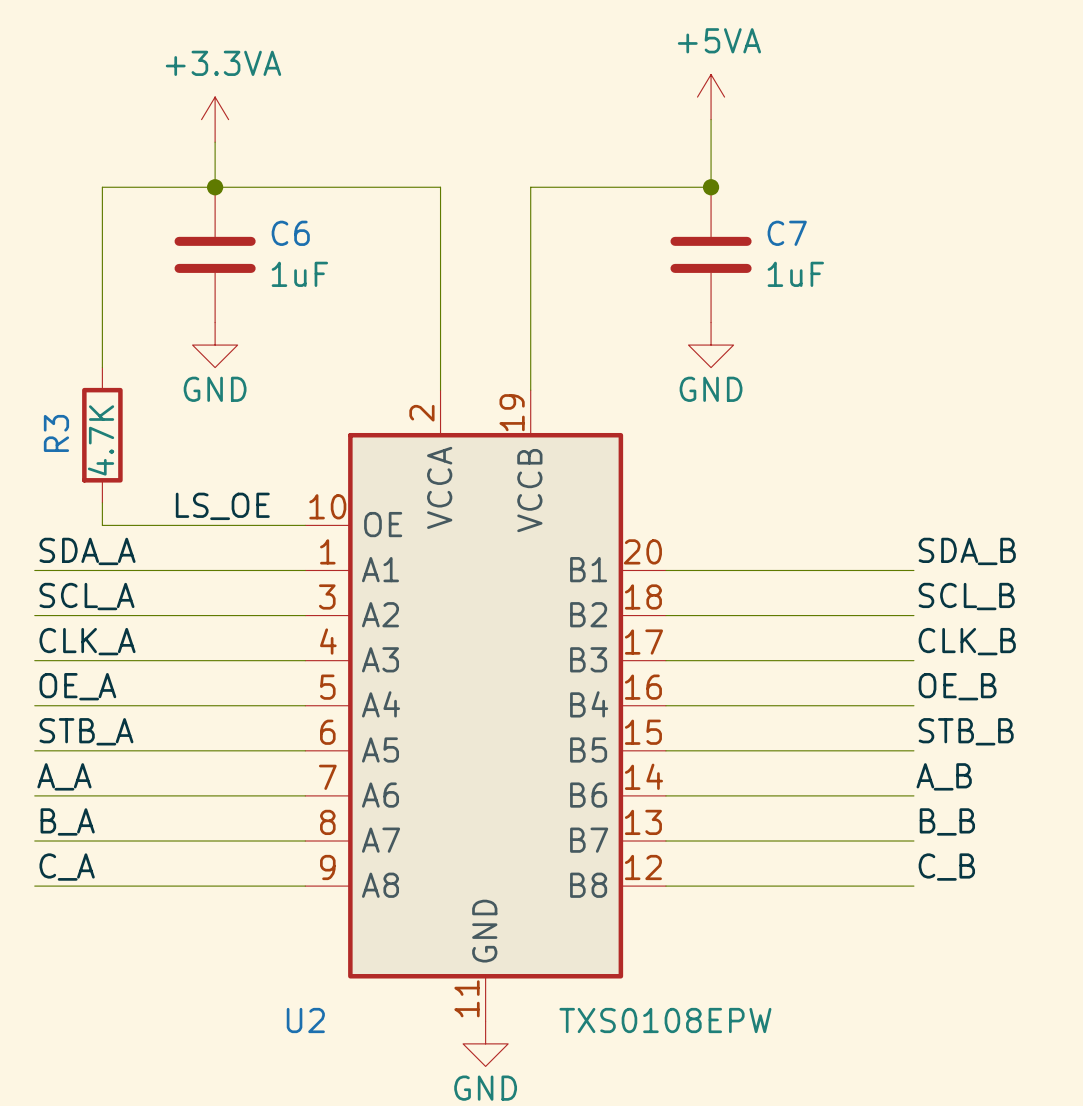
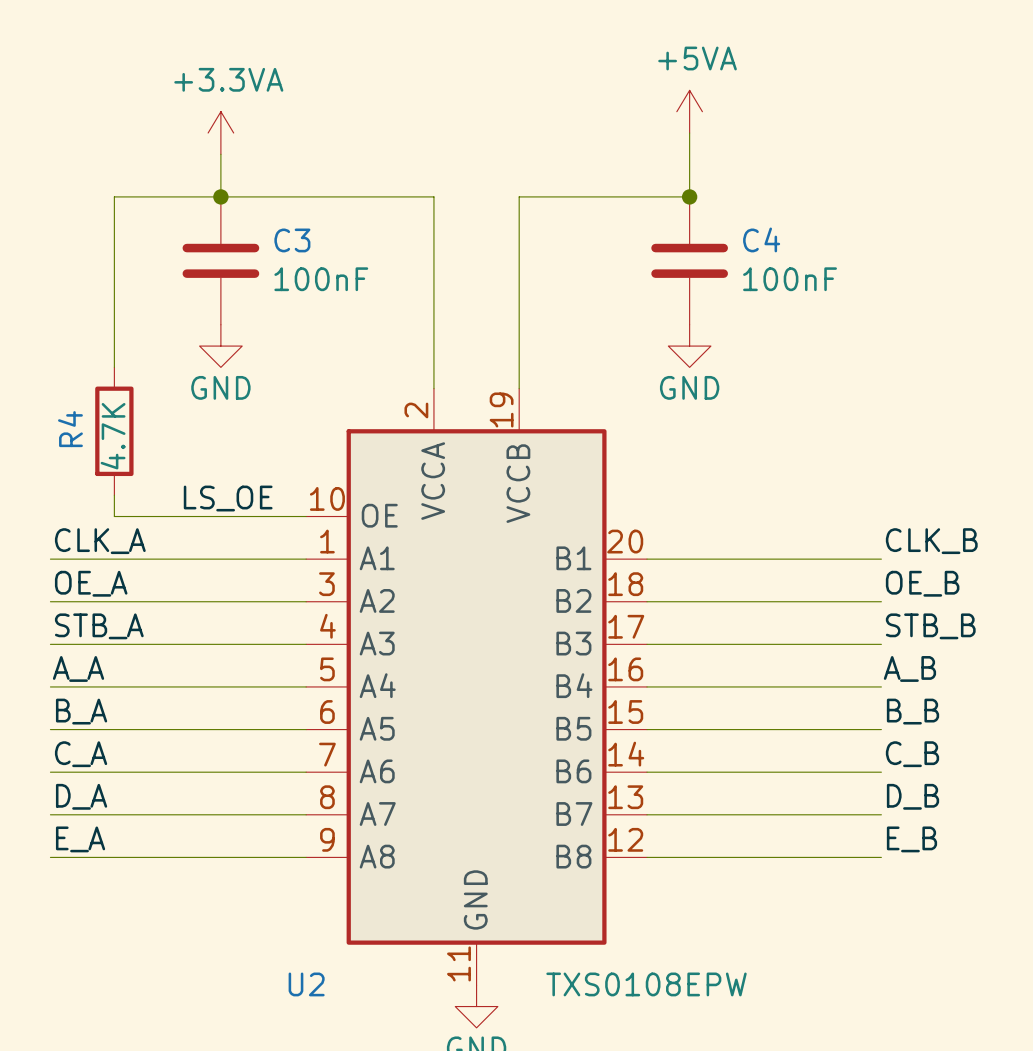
C6 name: C6 (290, 233) -> C3 (292, 240)
C7 name: C7 (787, 233) -> C4 (761, 239)
C6 value: 1uF (299, 274) -> 100nF (321, 279)
C7 value: 1uF (795, 274) -> 100nF (790, 279)
R3 name: R3 (56, 433) -> R4 (70, 429)
label: SDA_A (87, 551) -> CLK_A (100, 541)
label: SDA_B (967, 551) -> CLK_B (931, 541)
label: SCL_A (86, 596) -> OE_A (91, 583)
label: SCL_B (966, 596) -> OE_B (922, 583)
label: CLK_A (87, 641) -> STB_A (99, 626)
label: CLK_B (967, 641) -> STB_B (930, 626)
label: OE_A (77, 686) -> A_A (78, 668)
label: OE_B (957, 686) -> A_B (909, 668)
label: STB_A (86, 731) -> B_A (81, 711)
label: STB_B (966, 731) -> B_B (912, 711)
label: A_A (64, 776) -> C_A (81, 754)
label: A_B (944, 776) -> C_B (912, 754)
label: B_A (67, 821) -> D_A (81, 796)
label: B_B (947, 821) -> D_B (912, 796)
label: C_A (67, 867) -> E_A (80, 839)
label: C_B (946, 867) -> E_B (911, 839)

